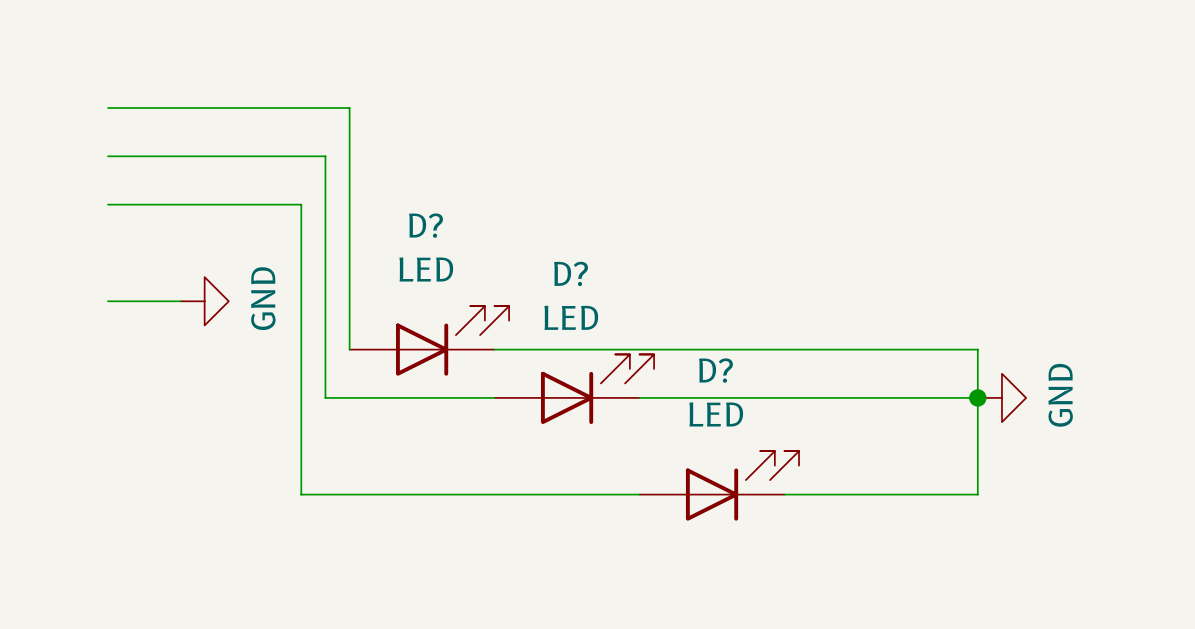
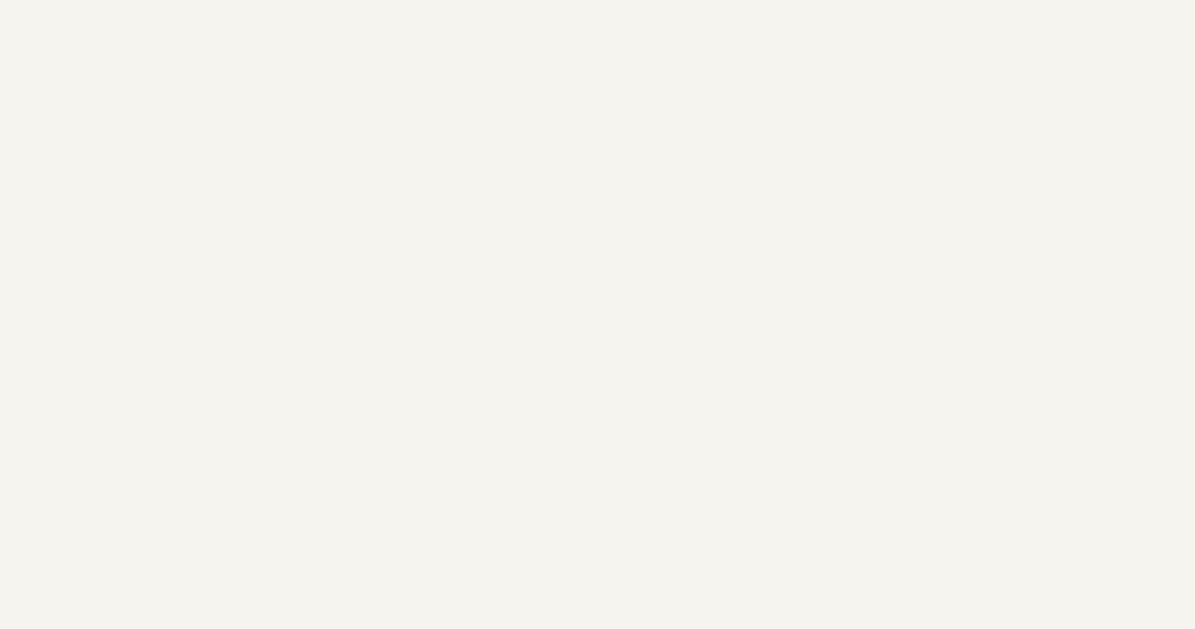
wire: (107, 107) (349, 107) (349, 349) -> none
wire: (107, 156) (325, 156) (325, 397) (494, 397) -> none
wire: (107, 204) (301, 204) (301, 494) (639, 494) -> none
wire: (107, 301) (180, 301) -> none
power symbol: GND (204, 301) -> none
D?: LED (429, 340) -> none
wire: (494, 349) (977, 349) (977, 494) (784, 494) -> none
D?: LED (574, 389) -> none
wire: (639, 397) (977, 397) -> none
junction: (977, 397) -> none
power symbol: GND (1001, 397) -> none
D?: LED (719, 485) -> none

